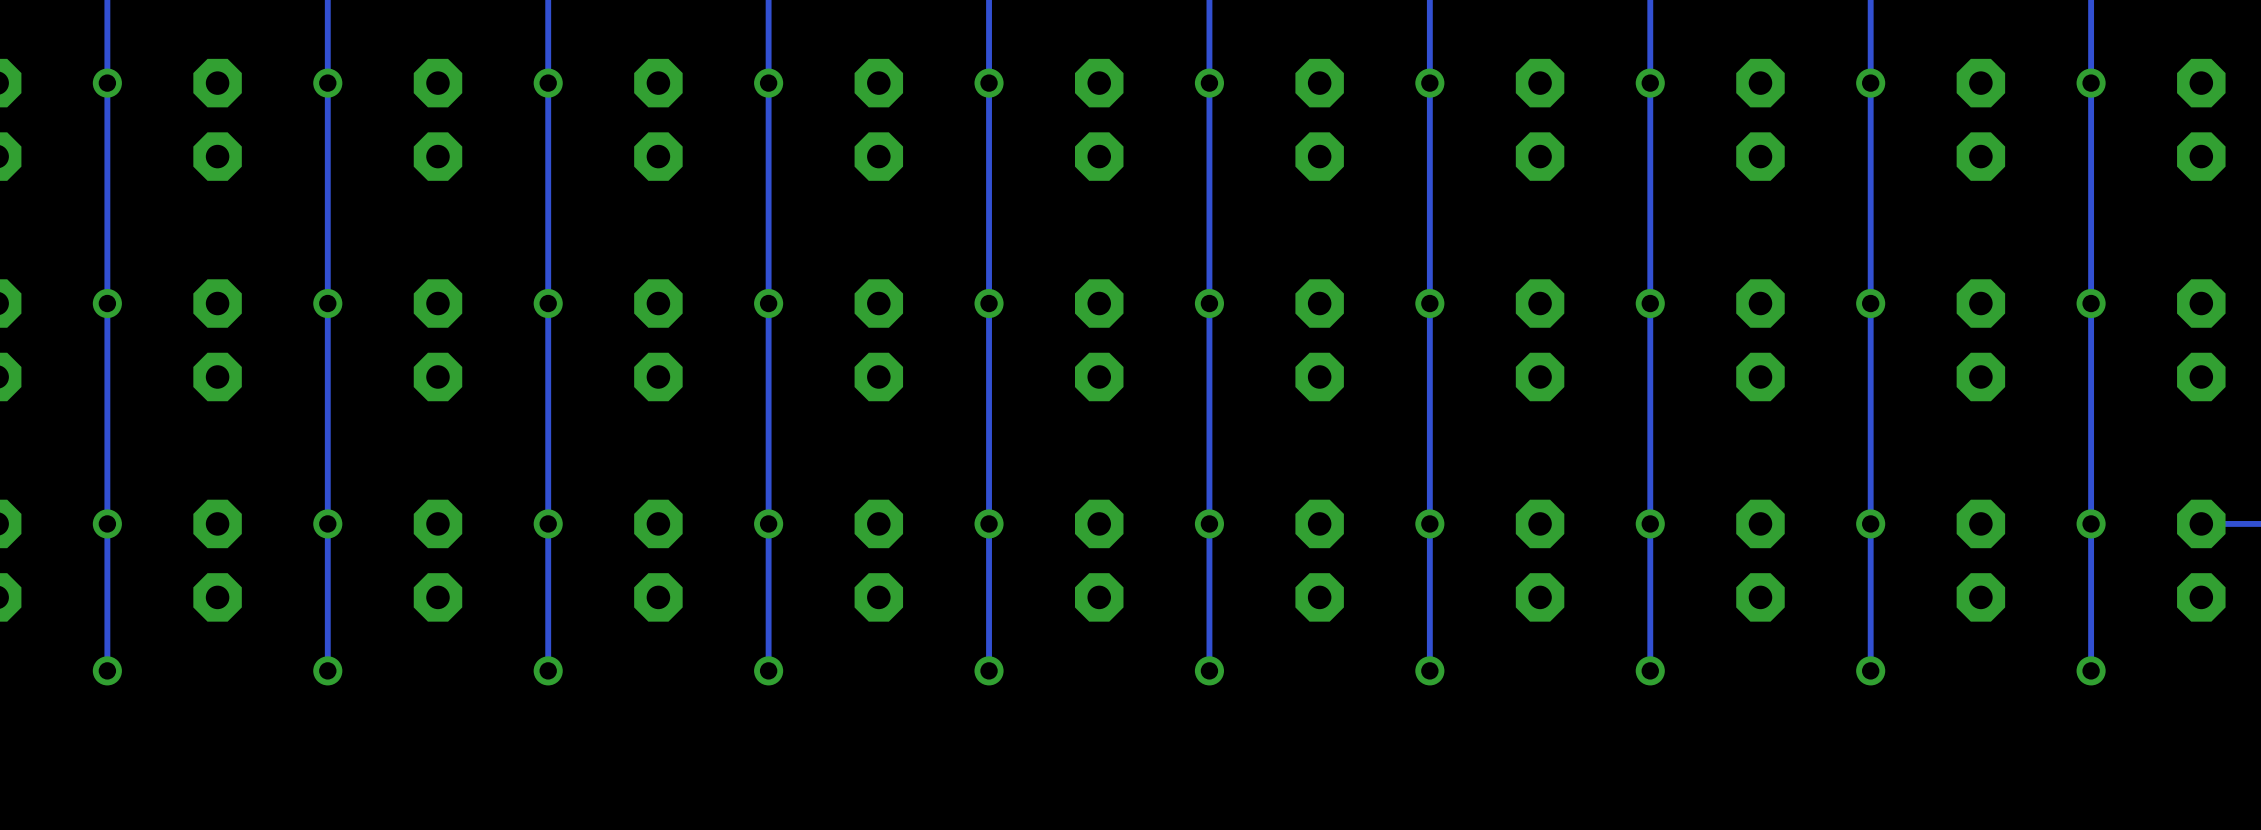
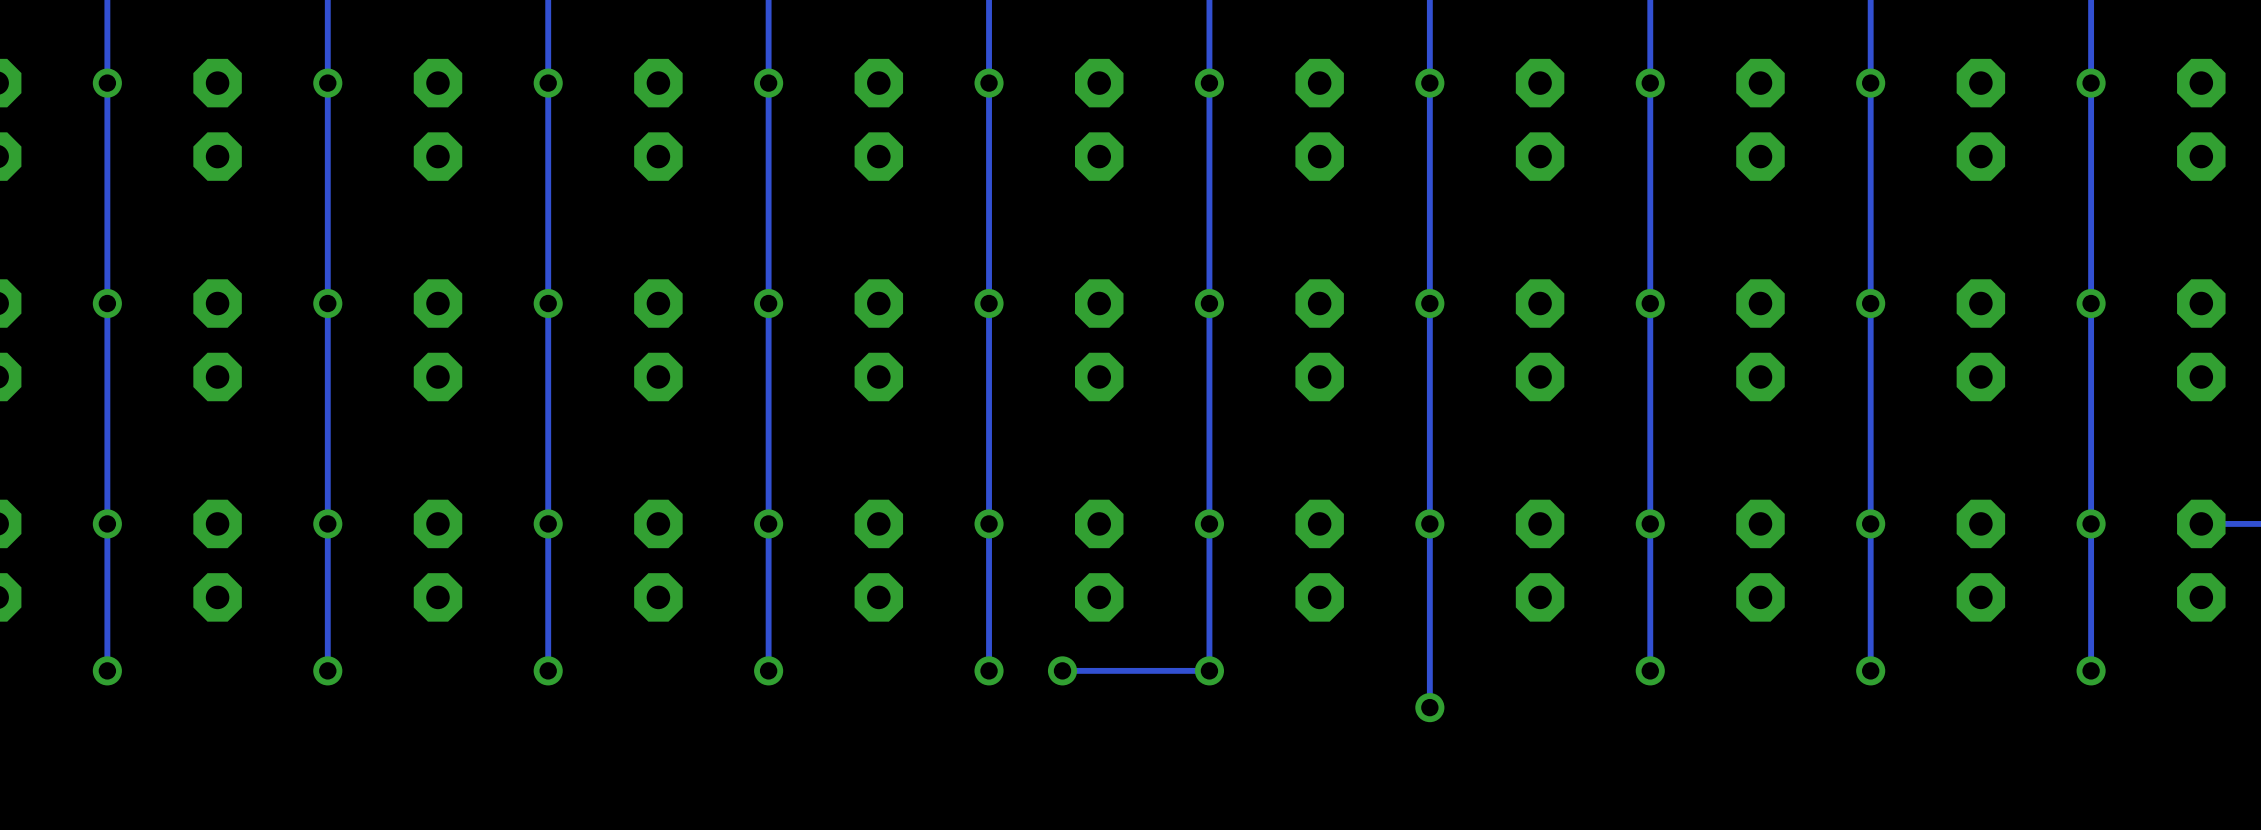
via: none -> (1062, 670)
track: none -> (1209, 670) (1062, 670)
track: none -> (1429, 670) (1429, 707)
via position: (1429, 670) -> (1429, 707)

